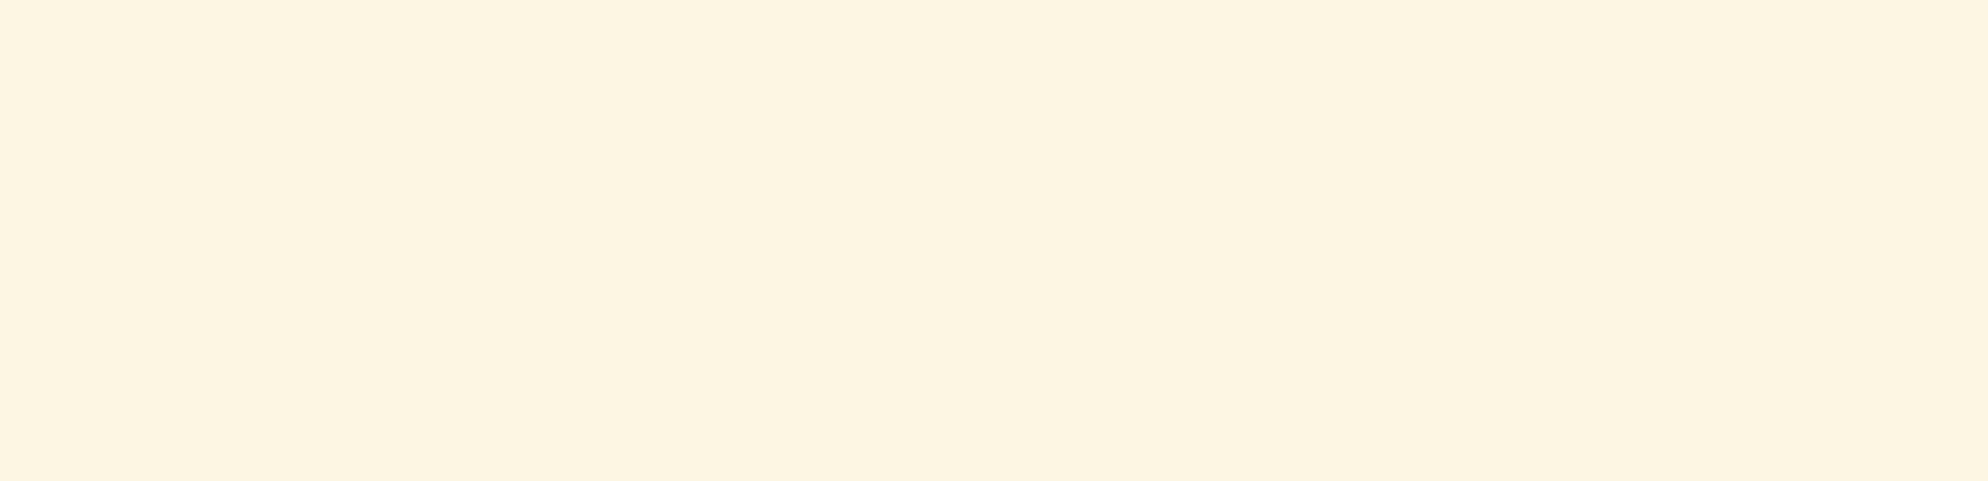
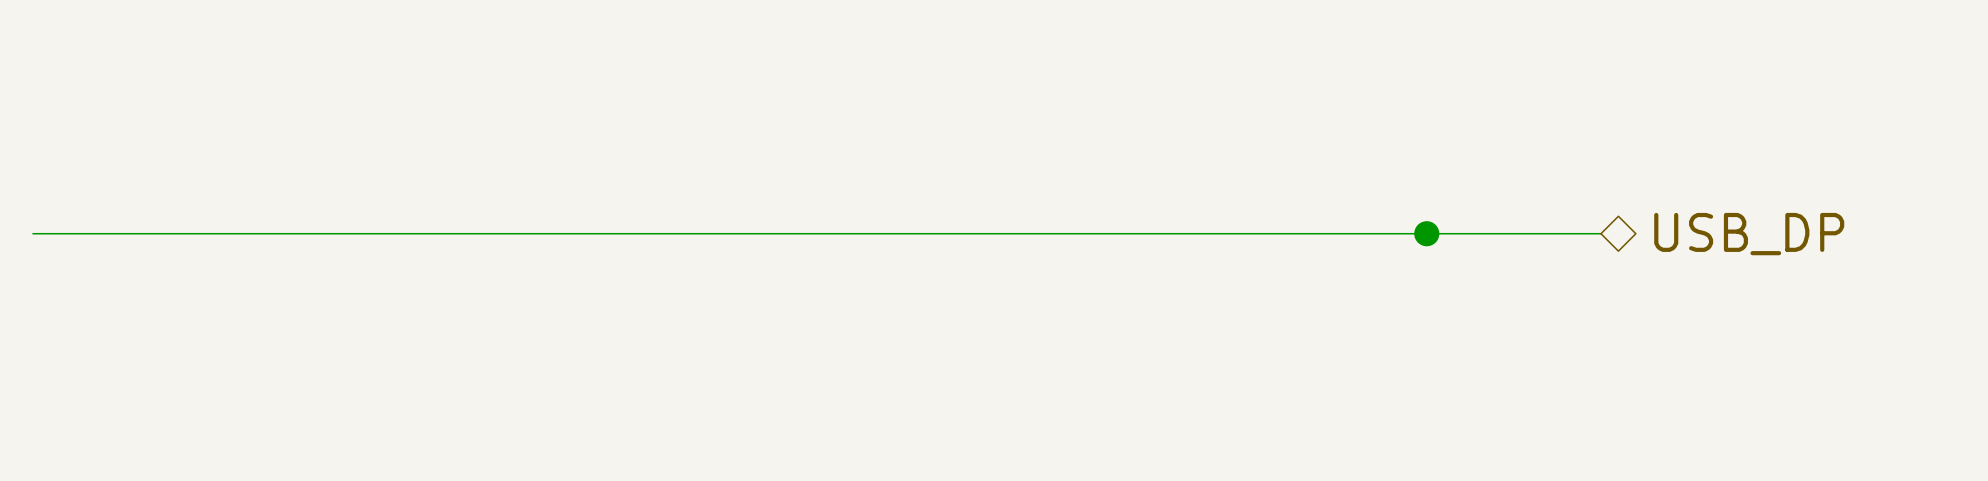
wire: none -> (32, 233) (1600, 233)
junction: none -> (1426, 233)
hierarchical label: none -> USB_DP (1749, 234)

